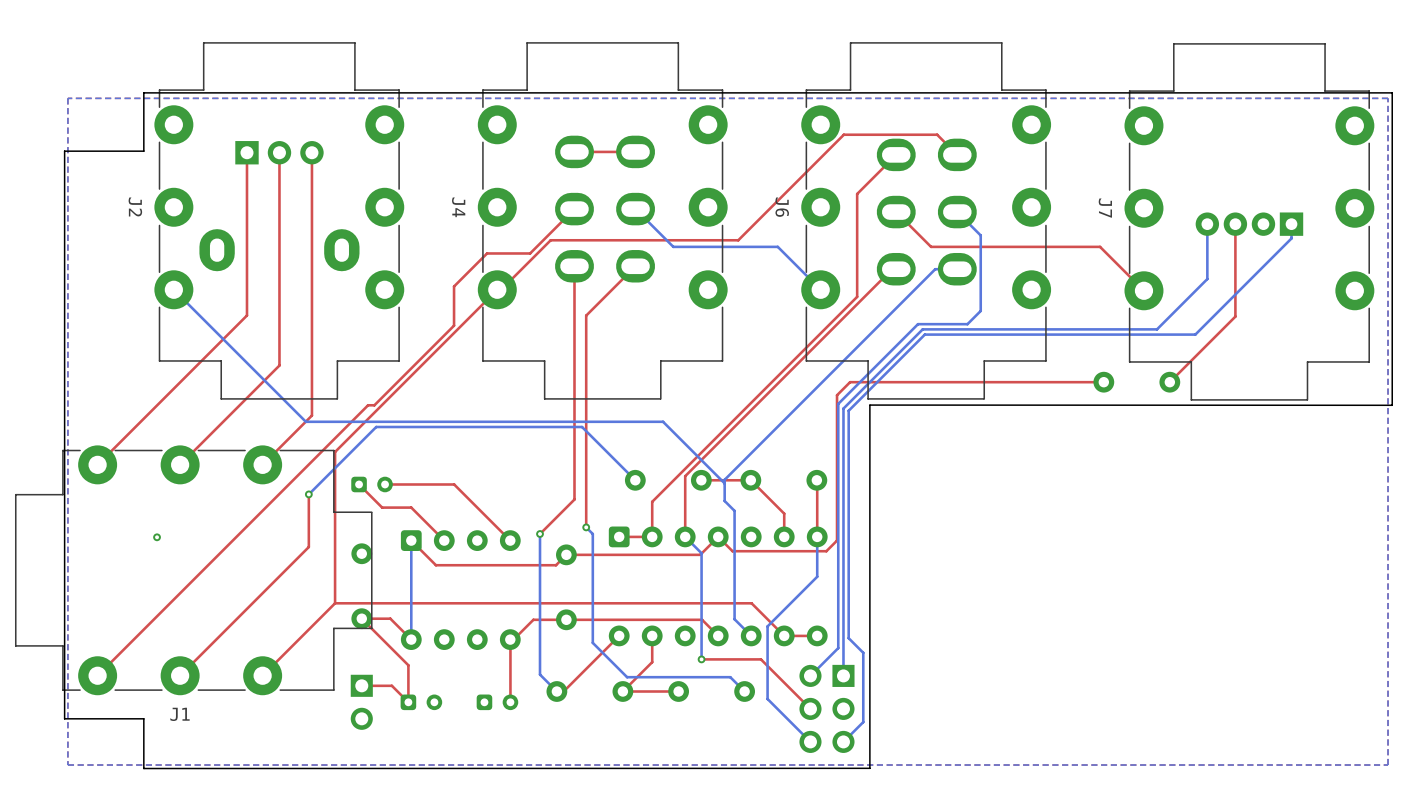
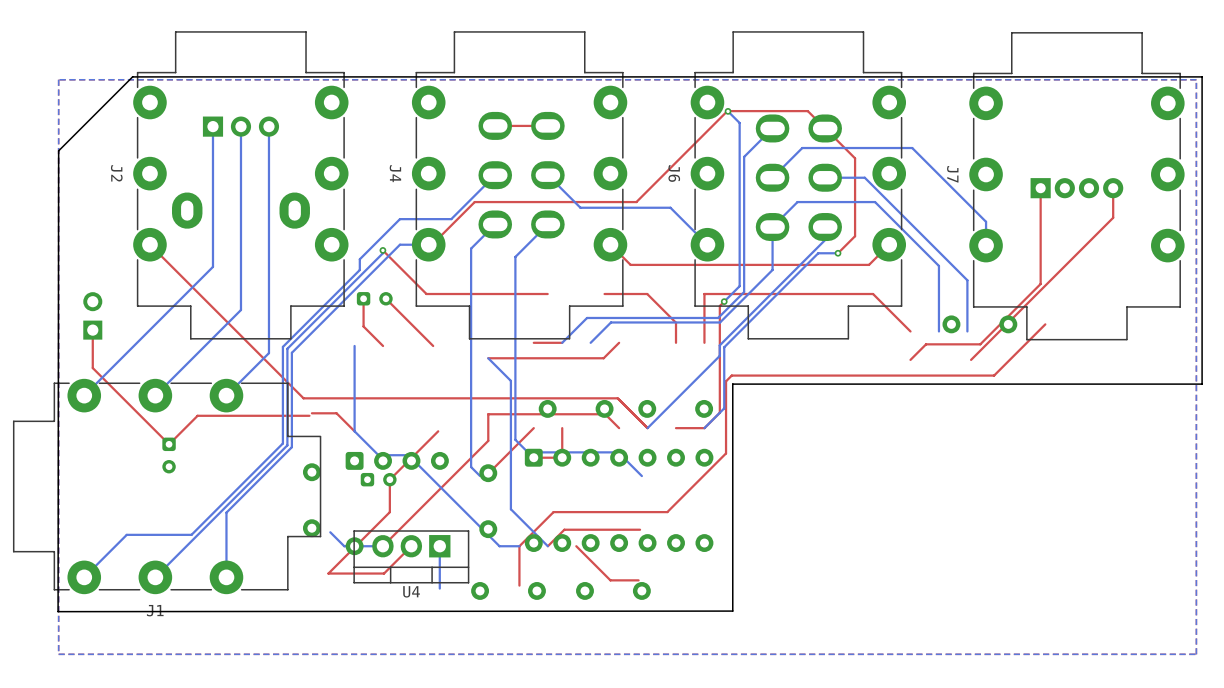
bottom track: none -> (728, 111) (739, 123) (739, 286) (724, 301)
via: none -> (728, 111)
top track: (246, 152) (246, 315) (97, 464) -> none
bottom track: none -> (212, 126) (212, 266) (84, 395)
top track: (279, 152) (279, 365) (180, 464) -> none
bottom track: none -> (240, 126) (240, 310) (155, 395)
top track: (311, 152) (311, 415) (262, 464) -> none
bottom track: none -> (268, 126) (268, 353) (226, 395)
top track: (896, 154) (857, 193) (857, 296) (652, 502) -> none
bottom track: none -> (772, 128) (744, 156) (744, 292) (718, 317) (587, 317) (562, 342)
top track: none -> (825, 128) (855, 158) (855, 236) (838, 253)
top track: (574, 209) (530, 253) (487, 253) (454, 286) (454, 325) (374, 405) (368, 405) (97, 675) -> none
bottom track: none -> (495, 175) (451, 219) (399, 219) (359, 259) (359, 270) (282, 346) (282, 443) (191, 534) (126, 534) (84, 577)
top track: (896, 212) (931, 246) (1100, 246) (1143, 290) -> none
bottom track: none -> (772, 177) (802, 148) (912, 148) (986, 221) (986, 245)
bottom track: (957, 212) (980, 235) (980, 310) (967, 324) (917, 324) (838, 403) (838, 648) (810, 675) -> (825, 177) (864, 177) (967, 280) (967, 331)
top track: none -> (1040, 188) (1040, 283) (980, 344) (926, 344) (910, 359)
bottom track: (1207, 224) (1207, 279) (1157, 329) (922, 329) (843, 408) (843, 675) -> none
top track: (1235, 224) (1235, 316) (1169, 382) -> none
part rotation: 0° (1249, 224) -> 180° (1076, 188)
top track: none -> (1113, 188) (1113, 217) (971, 359)
bottom track: (1291, 224) (1291, 238) (1195, 334) (924, 334) (848, 410) (848, 638) (863, 652) (863, 722) (843, 741) -> none
top track: (574, 266) (574, 499) (540, 534) -> none
bottom track: none -> (495, 224) (471, 248) (471, 467) (480, 476)
top track: (635, 266) (586, 315) (586, 527) -> none
bottom track: none -> (547, 224) (515, 256) (515, 439) (527, 452) (618, 452) (641, 476)
top track: (892, 269) (685, 476) (685, 536) -> none
bottom track: (957, 269) (935, 269) (724, 479) (724, 500) (734, 510) (734, 619) (751, 635) -> (825, 227) (825, 239) (719, 345) (719, 355) (647, 428)
top track: none -> (149, 244) (303, 398) (617, 398) (647, 428)
bottom track: (173, 289) (305, 421) (663, 421) (724, 483) -> none
top track: (497, 289) (335, 452) (335, 603) -> none
bottom track: none -> (428, 244) (399, 244) (291, 352) (291, 447) (226, 512) (226, 577)
top track: none -> (889, 244) (869, 264) (630, 264) (610, 244)
top track: none -> (382, 250) (426, 294) (547, 294)
bottom track: none -> (382, 250) (382, 253) (287, 348) (287, 445) (155, 577)
via: none -> (382, 250)
bottom track: none -> (838, 253) (818, 253) (724, 347) (724, 408) (704, 428)
via: none -> (838, 253)
top track: none -> (704, 294) (873, 294) (910, 331)
top track: none -> (363, 298) (363, 326) (383, 345)
part: none -> (374, 298)
top track: none -> (385, 298) (433, 345)
top track: none -> (724, 301) (719, 306) (719, 412) (704, 428) (676, 428)
via: none -> (724, 301)
part: none -> (92, 315)
top track: (1103, 382) (850, 382) (837, 395) (837, 540) (826, 551) (732, 551) (718, 536) (700, 554) (566, 554) (556, 565) (435, 565) (411, 540) -> none
top track: none -> (1045, 324) (994, 375) (731, 375) (726, 381) (726, 453) (667, 512) (553, 512) (519, 546) (519, 585)
top track: none -> (92, 330) (92, 368) (169, 444)
bottom track: none -> (938, 331) (938, 265) (875, 202) (797, 202) (772, 227) (772, 269) (720, 322) (611, 322) (590, 342)
top track: none -> (562, 342) (533, 342)
top track: none -> (619, 342) (603, 358) (488, 358)
board edge: (869, 405) (1392, 405) (1392, 92) (143, 92) (143, 151) (64, 151) (64, 718) (143, 718) (143, 768) (869, 768) (869, 405) -> (1202, 76) (1202, 384) (732, 384) (732, 611) (58, 611) (58, 150) (132, 76) (1202, 76)
bottom track: none -> (354, 345) (354, 431) (378, 455) (408, 455) (499, 546) (519, 546)
bottom track: none -> (488, 358) (510, 380) (510, 509) (547, 546)
bottom track: (635, 480) (582, 427) (376, 427) (308, 494) -> none
top track: (701, 480) (750, 480) (784, 513) (784, 536) -> (604, 294) (647, 294) (676, 322) (676, 342)
top track: (817, 480) (817, 536) -> (704, 294) (704, 342)
top track: (359, 484) (382, 507) (411, 507) (444, 540) -> none
part: (372, 484) -> none
top track: (385, 484) (454, 484) (510, 540) -> none
top track: none -> (311, 413) (336, 413) (354, 431)
top track: none -> (309, 415) (197, 415) (169, 444)
top track: (308, 494) (308, 547) (180, 675) -> none
via: (308, 494) -> none
top track: none -> (619, 428) (605, 414) (488, 414) (488, 440) (382, 546)
top track: none -> (438, 431) (389, 479) (389, 512) (328, 573) (384, 573) (411, 546)
bottom track: (586, 527) (592, 534) (592, 642) (627, 677) (730, 677) (744, 691) -> none
via: (586, 527) -> none
part: none -> (169, 455)
bottom track: (540, 534) (540, 674) (556, 691) -> none
via: (540, 534) -> none
bottom track: (685, 536) (701, 553) (701, 659) -> none
bottom track: (817, 536) (817, 576) (767, 626) (767, 699) (810, 741) -> none
via: (157, 537) -> none
bottom track: (411, 540) (411, 639) -> none
part: none -> (378, 479)
top track: (335, 603) (262, 675) -> none
top track: (335, 603) (751, 603) (784, 635) (817, 635) -> none
top track: none -> (640, 529) (564, 529) (547, 546)
bottom track: none -> (330, 532) (344, 546) (382, 546)
top track: (619, 635) (563, 691) -> (533, 428) (485, 476)
top track: (652, 635) (652, 662) (622, 691) (678, 691) -> none
top track: (718, 635) (702, 619) (533, 619) (513, 639) -> none
top track: (411, 639) (390, 618) (361, 618) (408, 665) (408, 702) (391, 685) (361, 685) -> none
top track: (510, 639) (510, 702) -> none
bottom track: none -> (439, 546) (439, 588)
top track: none -> (576, 546) (610, 580) (638, 580)
U4: none -> (411, 556)
top track: (701, 659) (760, 659) (810, 708) -> none
via: (701, 659) -> none
part: (361, 702) -> none
part: (421, 702) -> none
part: (497, 702) -> none
part: (826, 708) -> none

